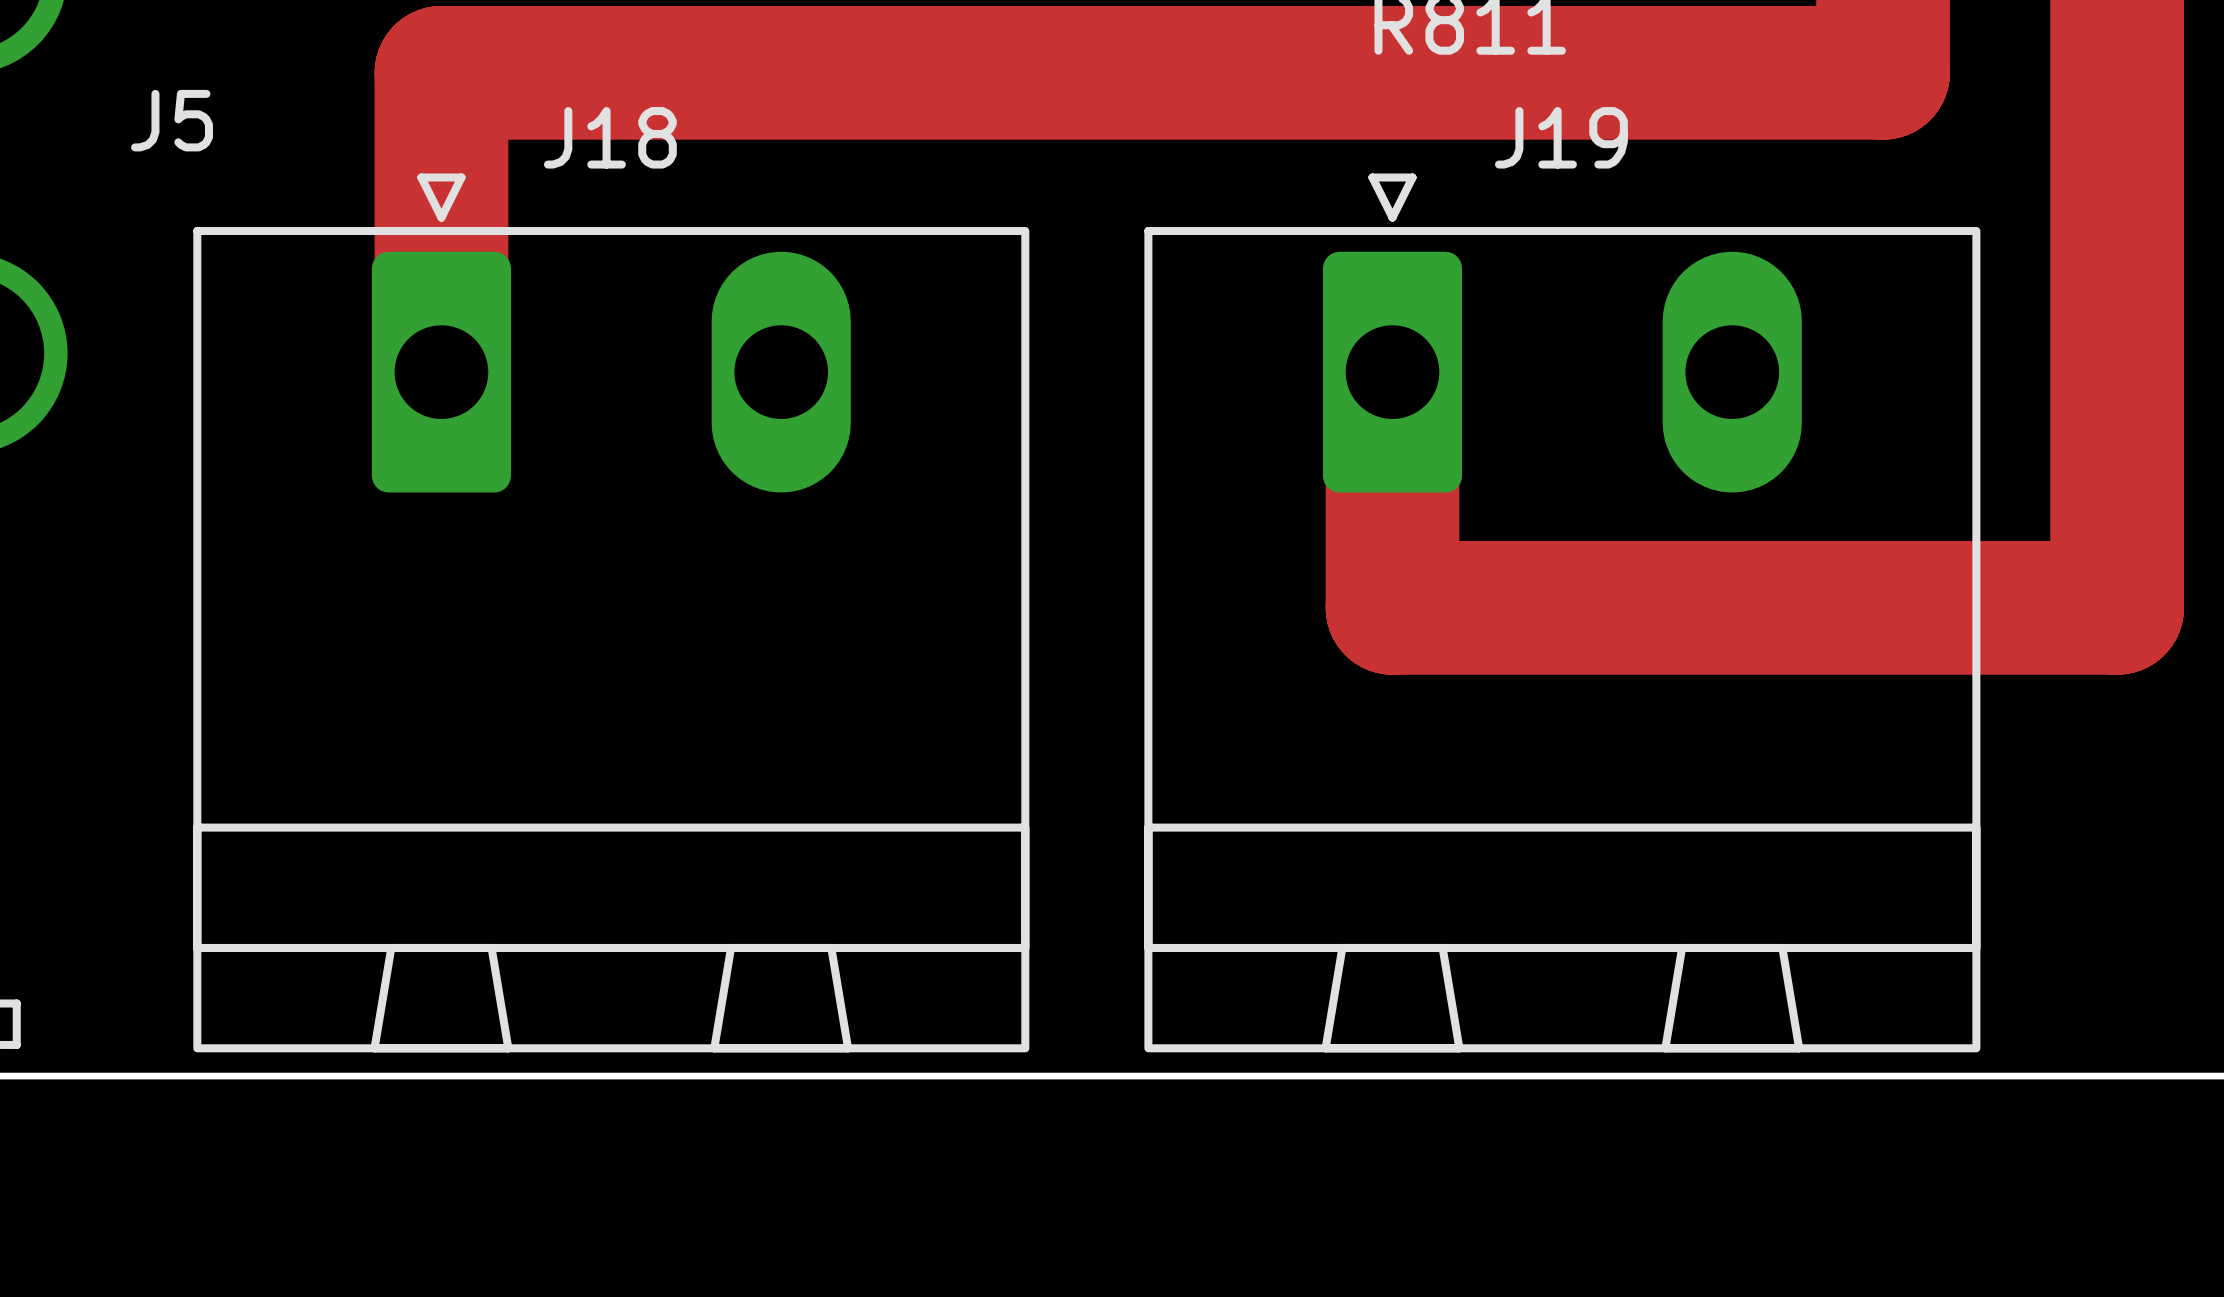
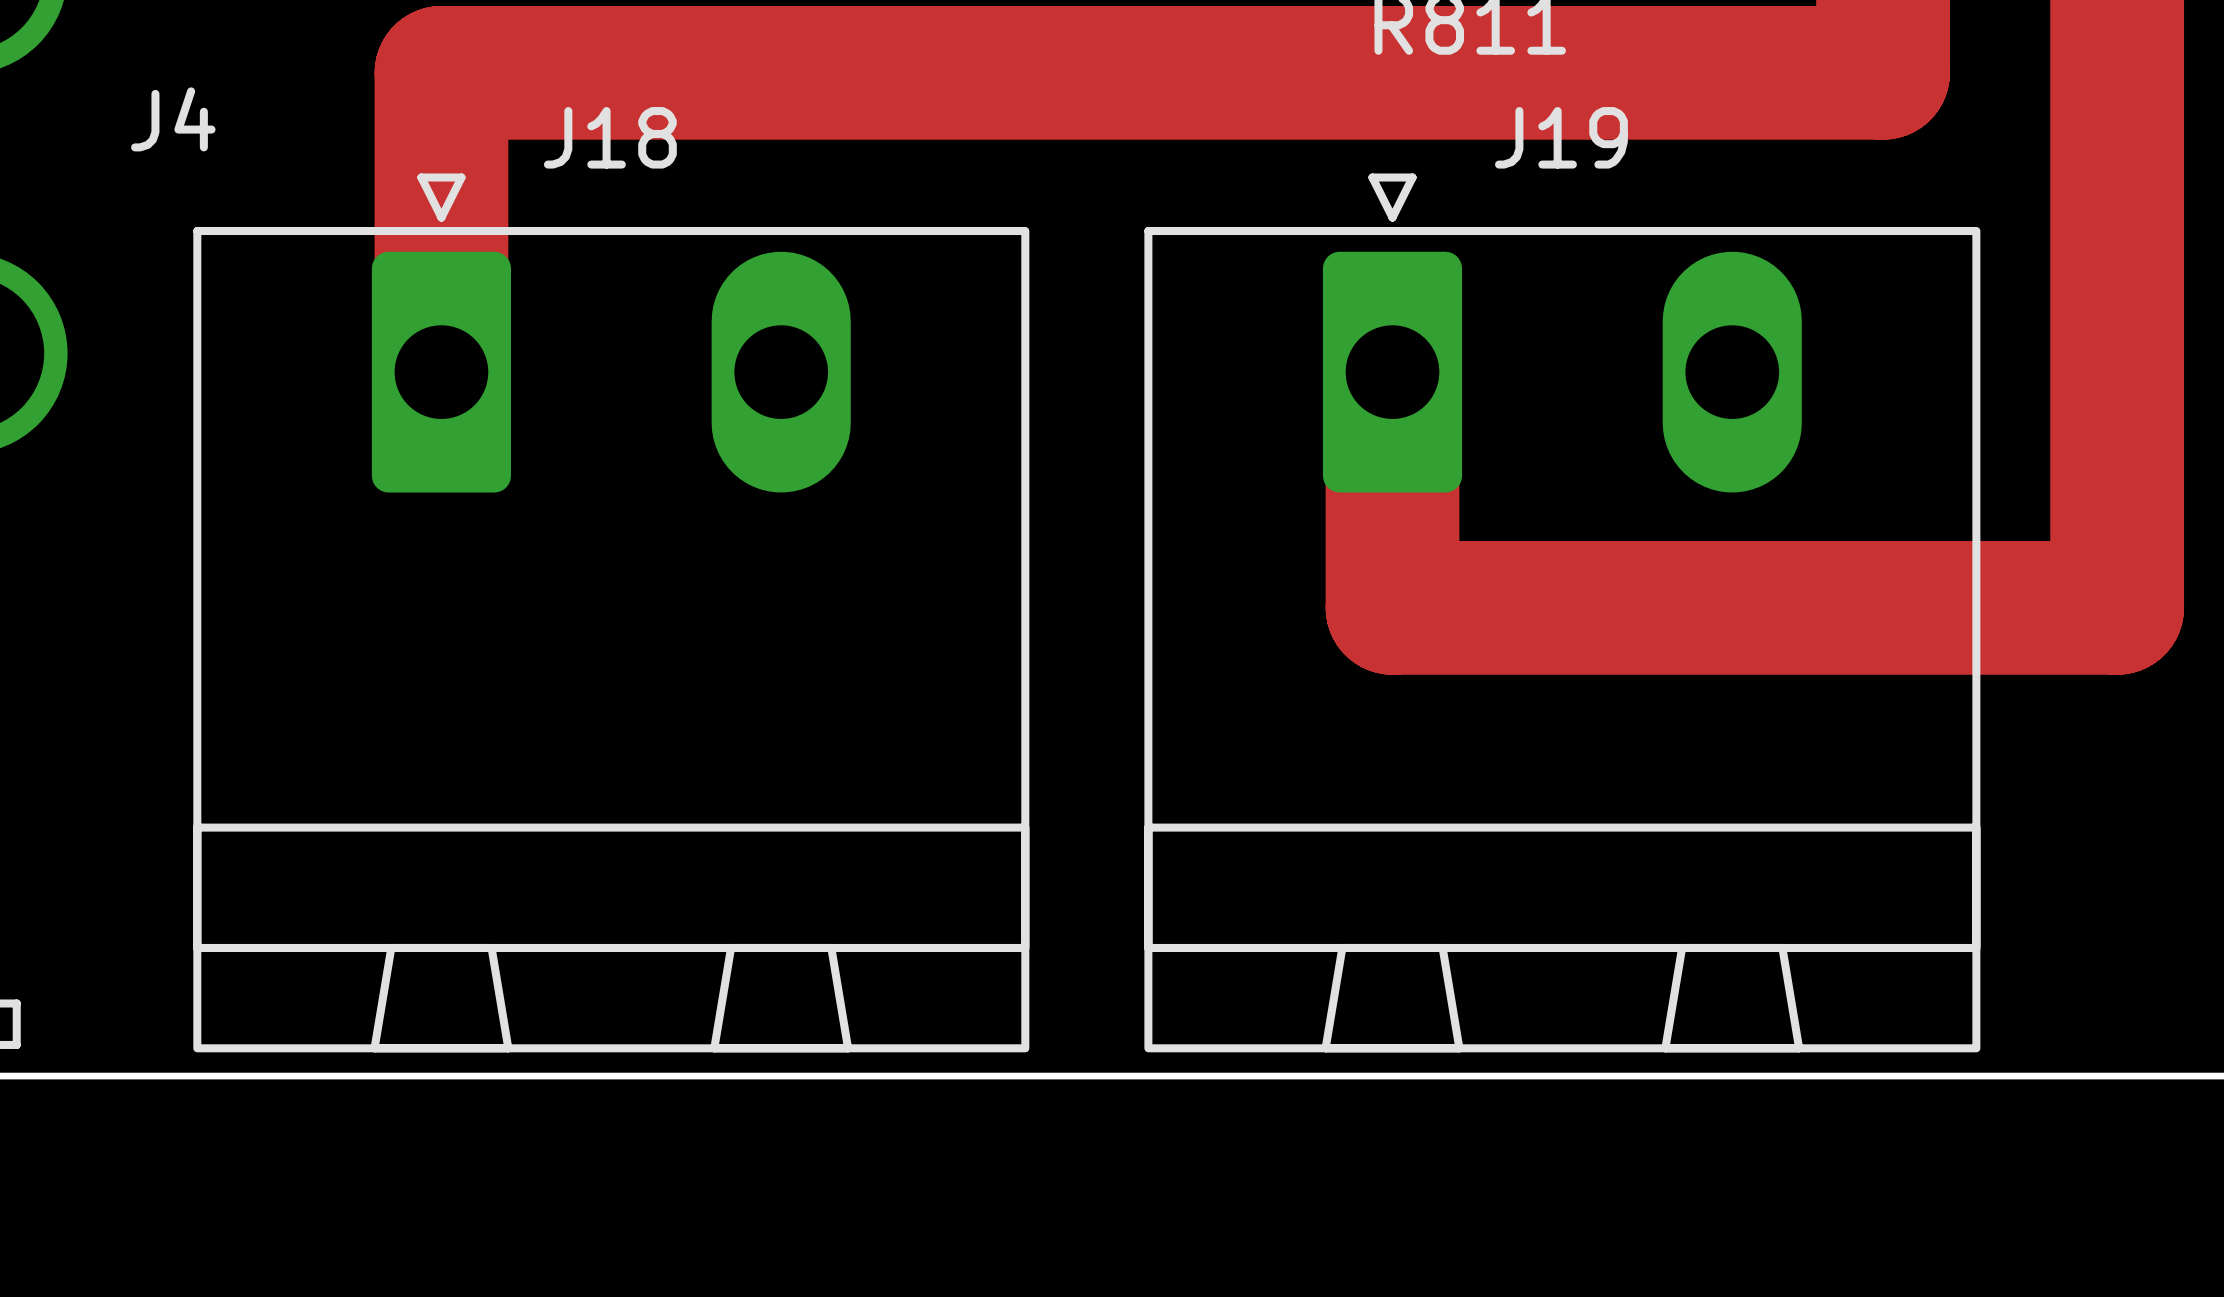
J5 name: J5 (172, 120) -> J4 (173, 119)

